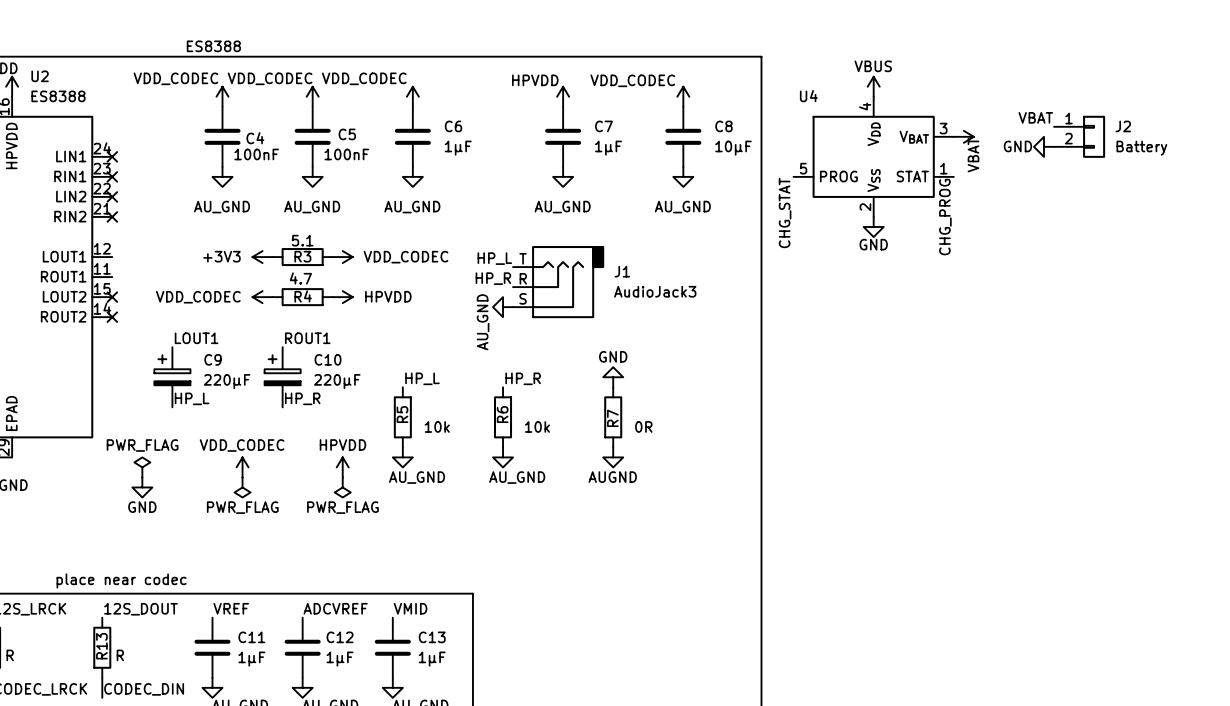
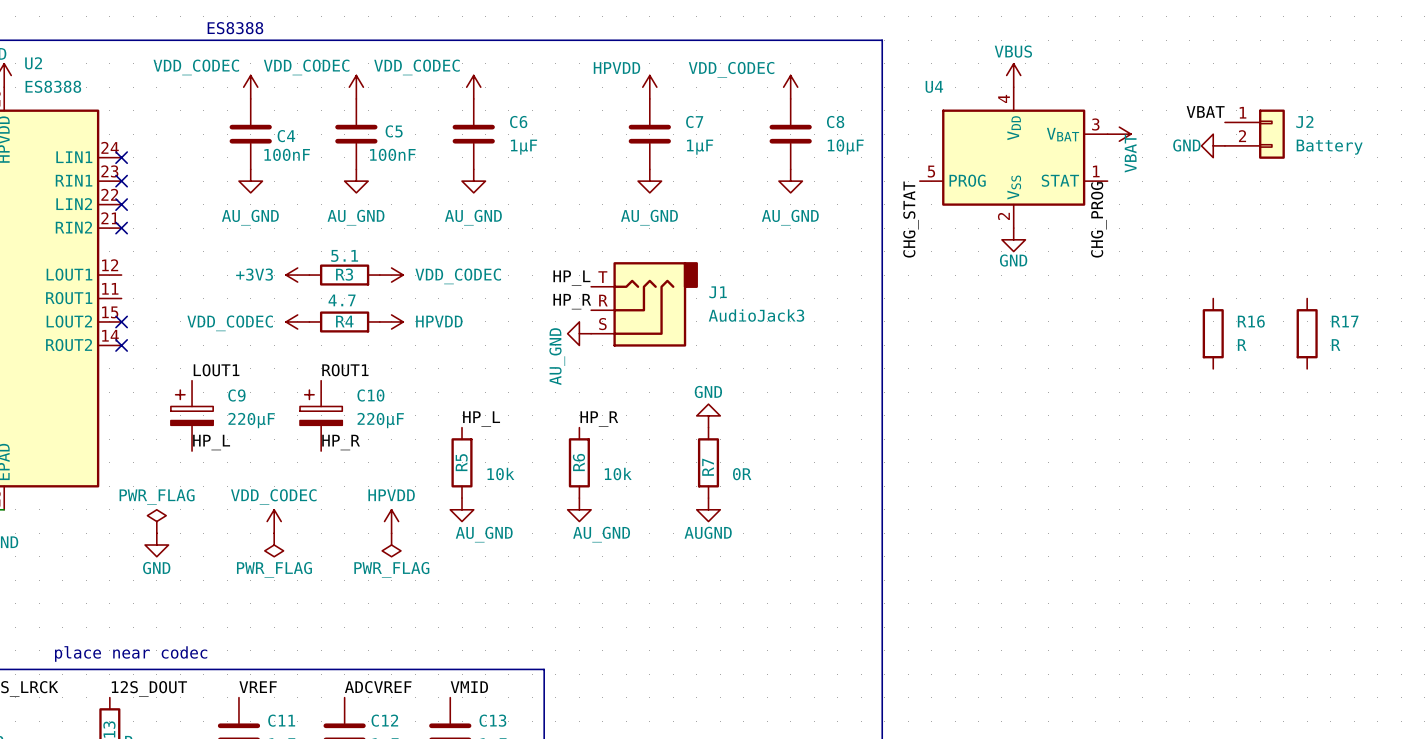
R16: none -> R (1213, 333)
R17: none -> R (1307, 333)

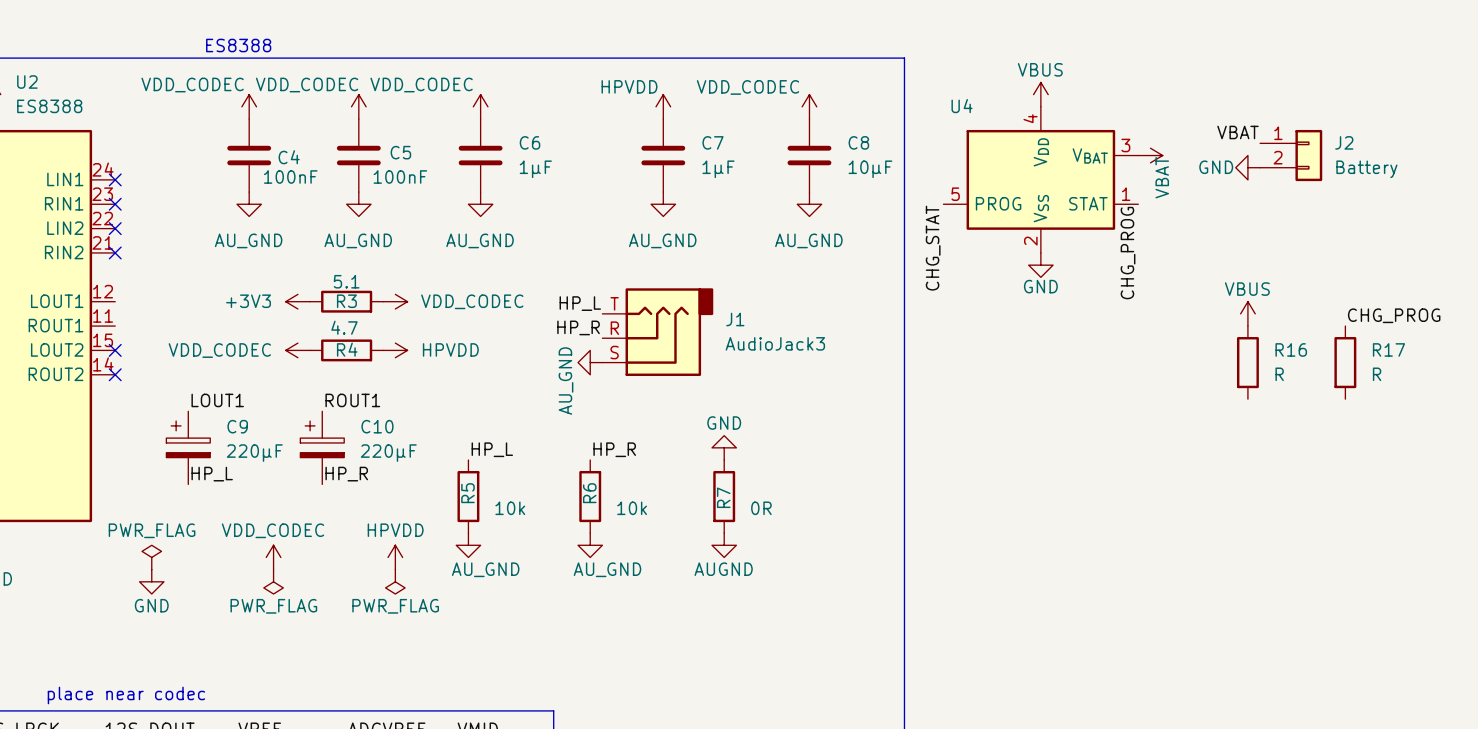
power symbol: none -> VBUS (1247, 313)
label: none -> CHG_PROG (1394, 315)

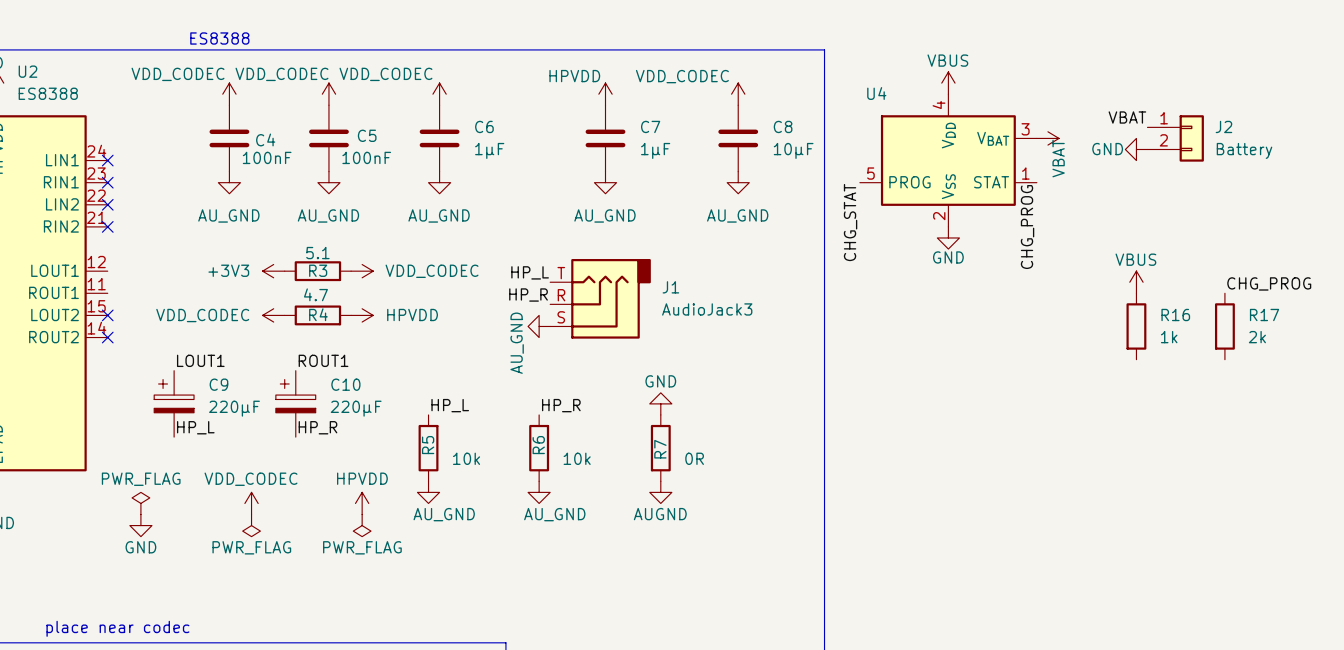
R16 value: R (1279, 374) -> 1k (1169, 337)
R17 value: R (1377, 374) -> 2k (1257, 337)

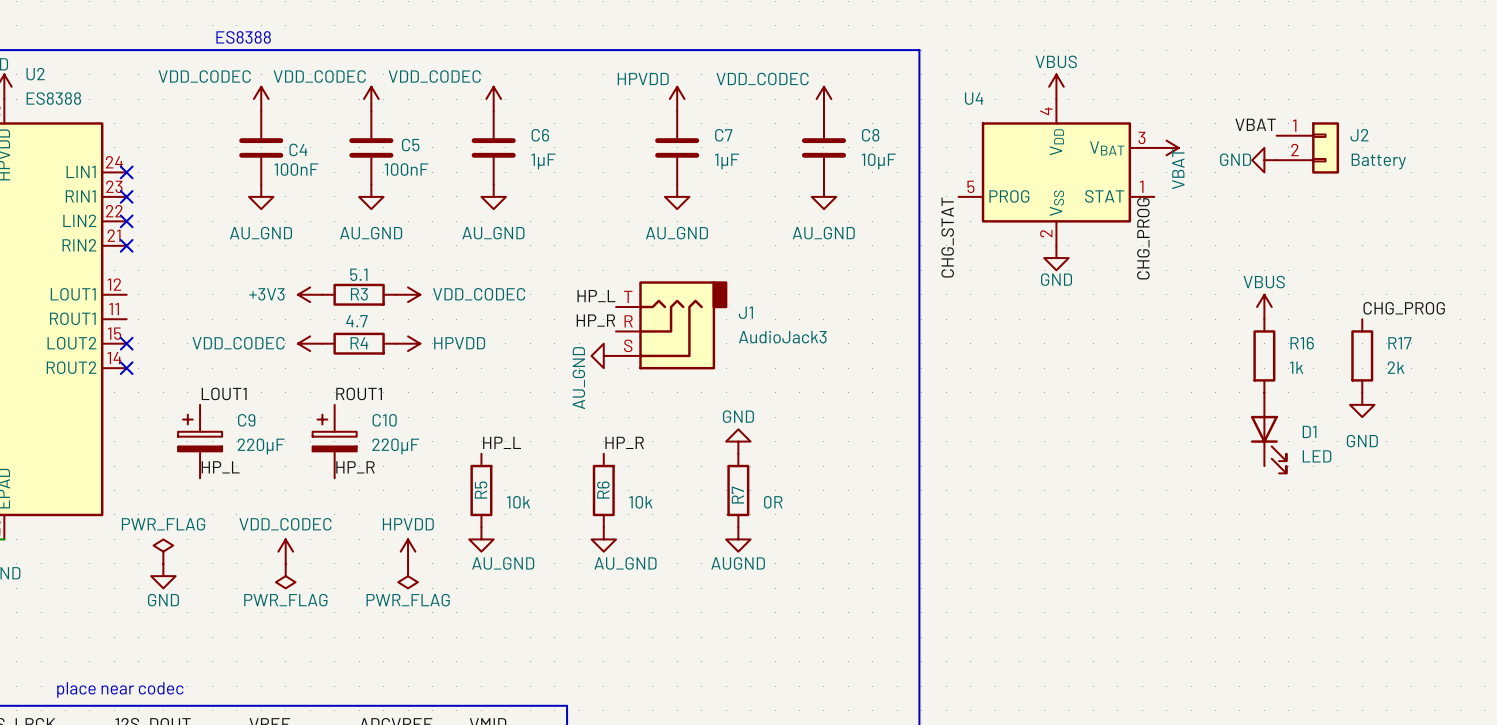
power symbol: none -> GND (1362, 404)
D1: none -> LED (1268, 433)

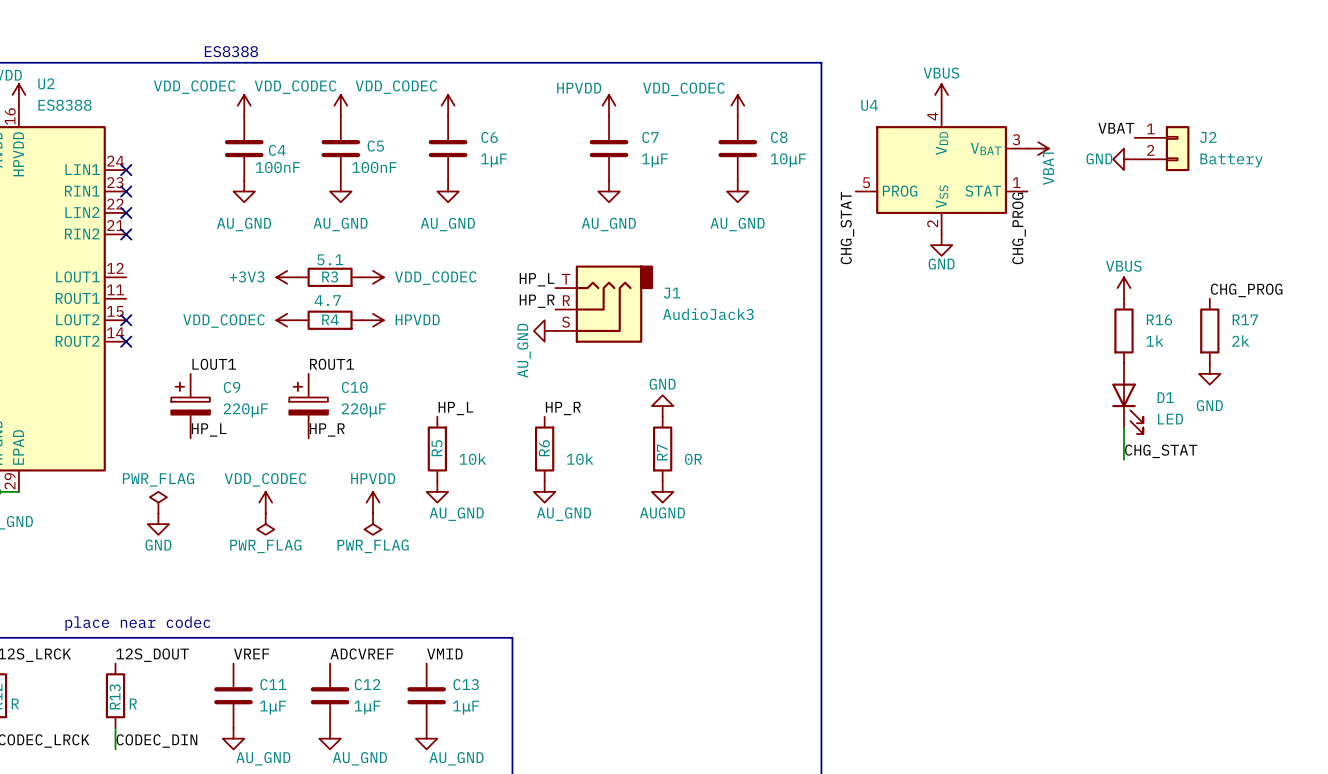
wire: none -> (1123, 427) (1123, 459)
label: none -> CHG_STAT (1161, 451)

